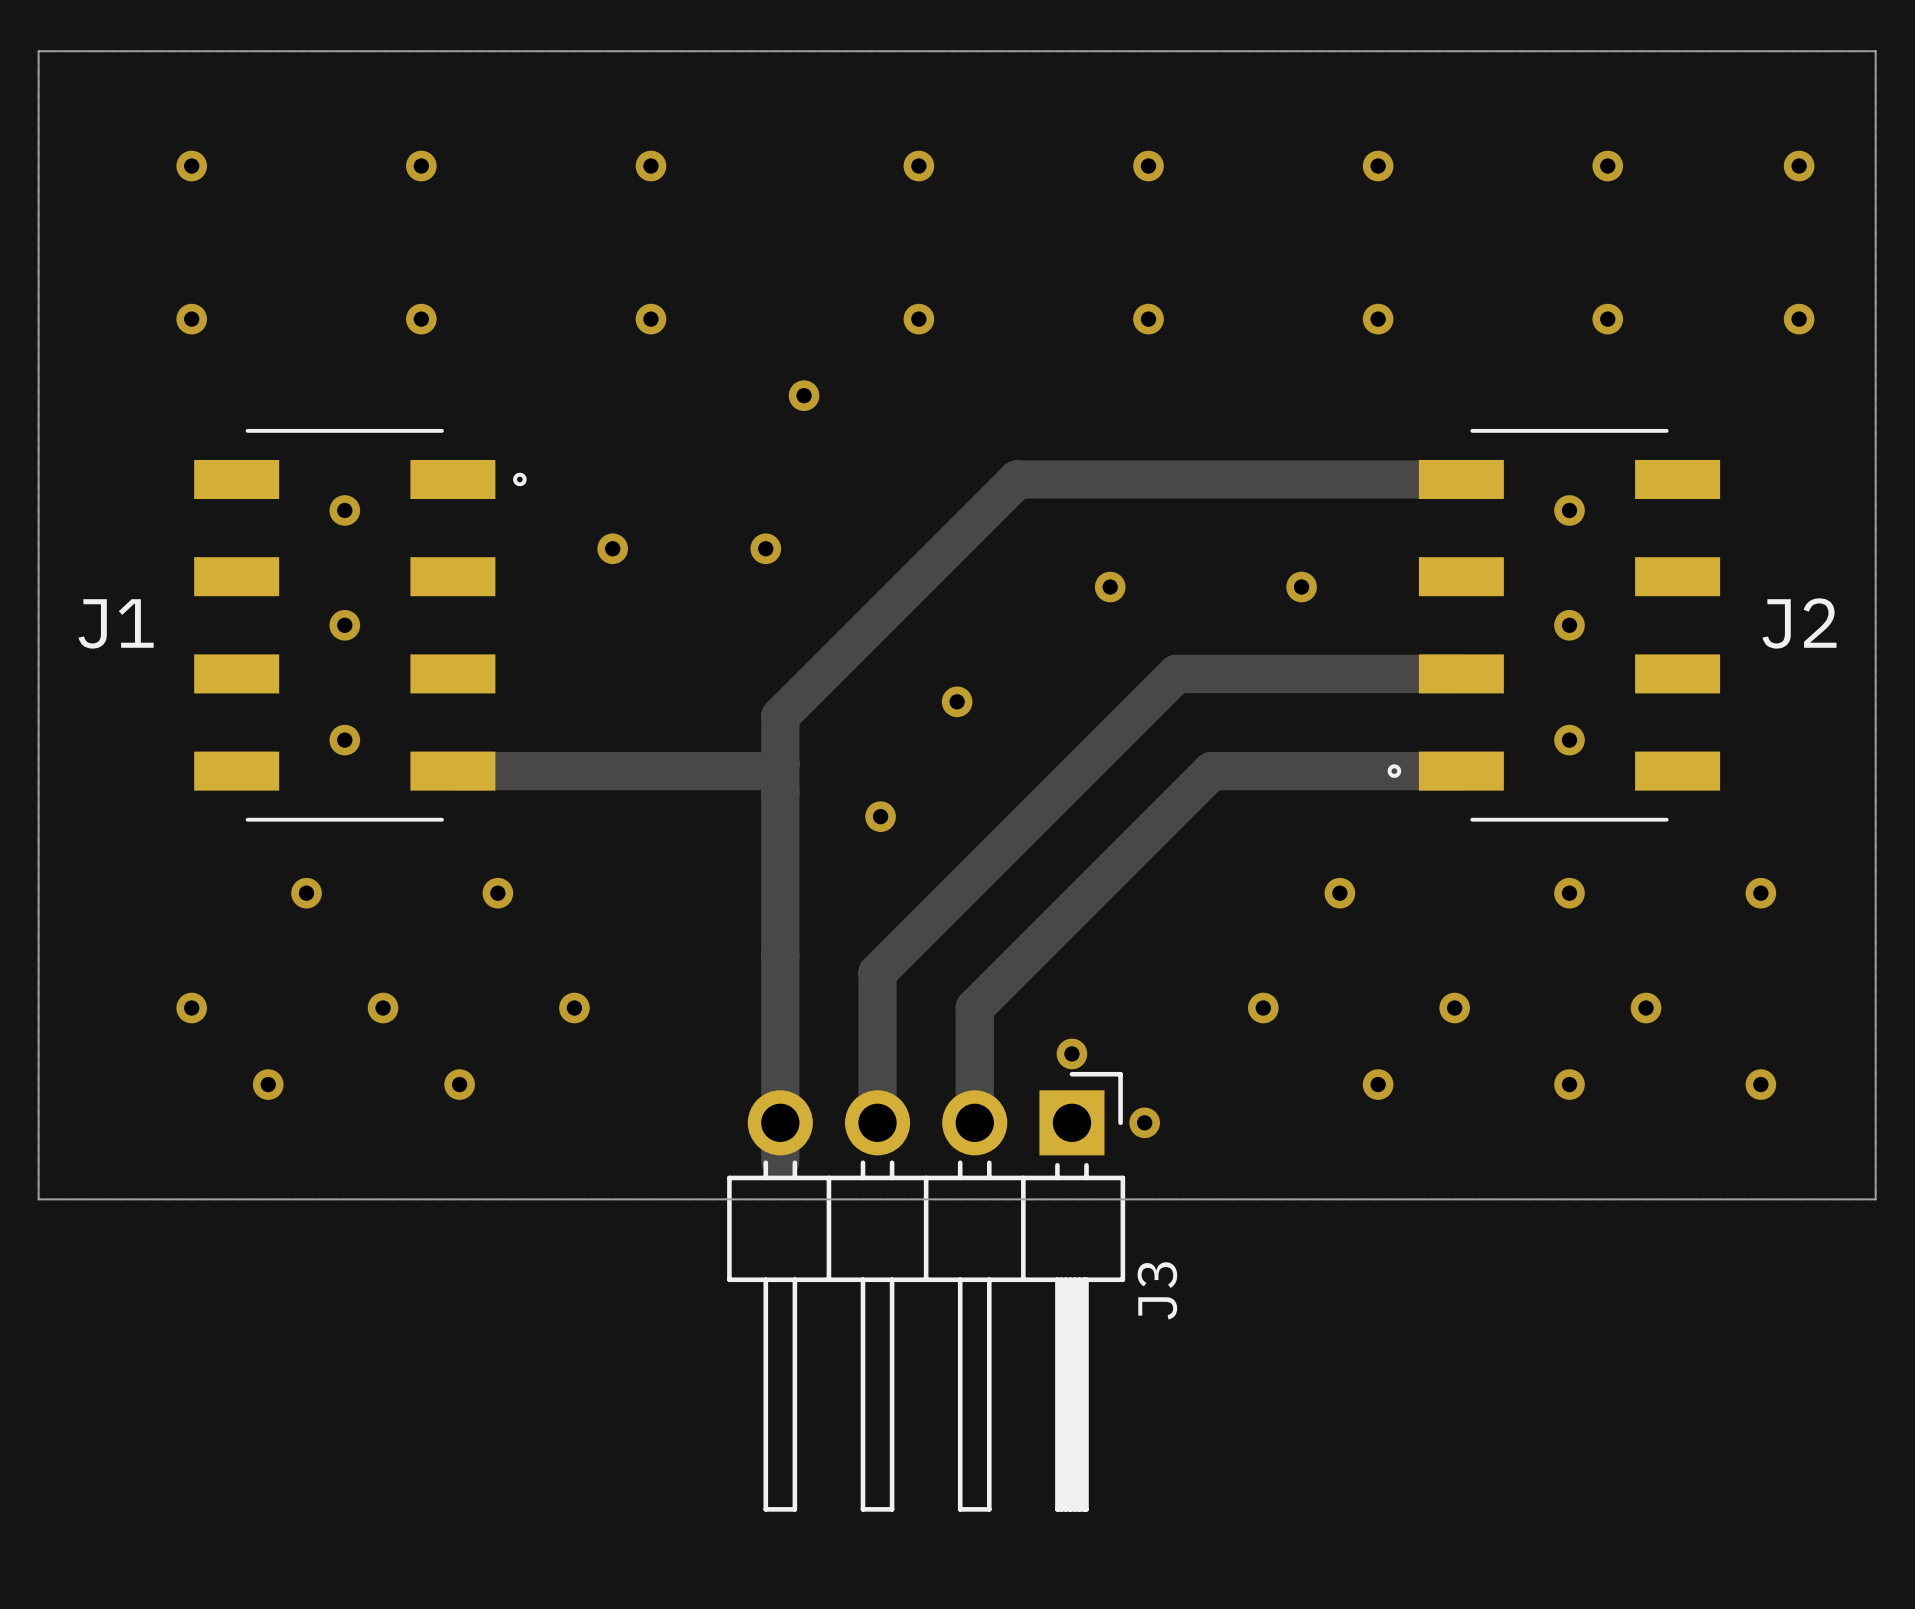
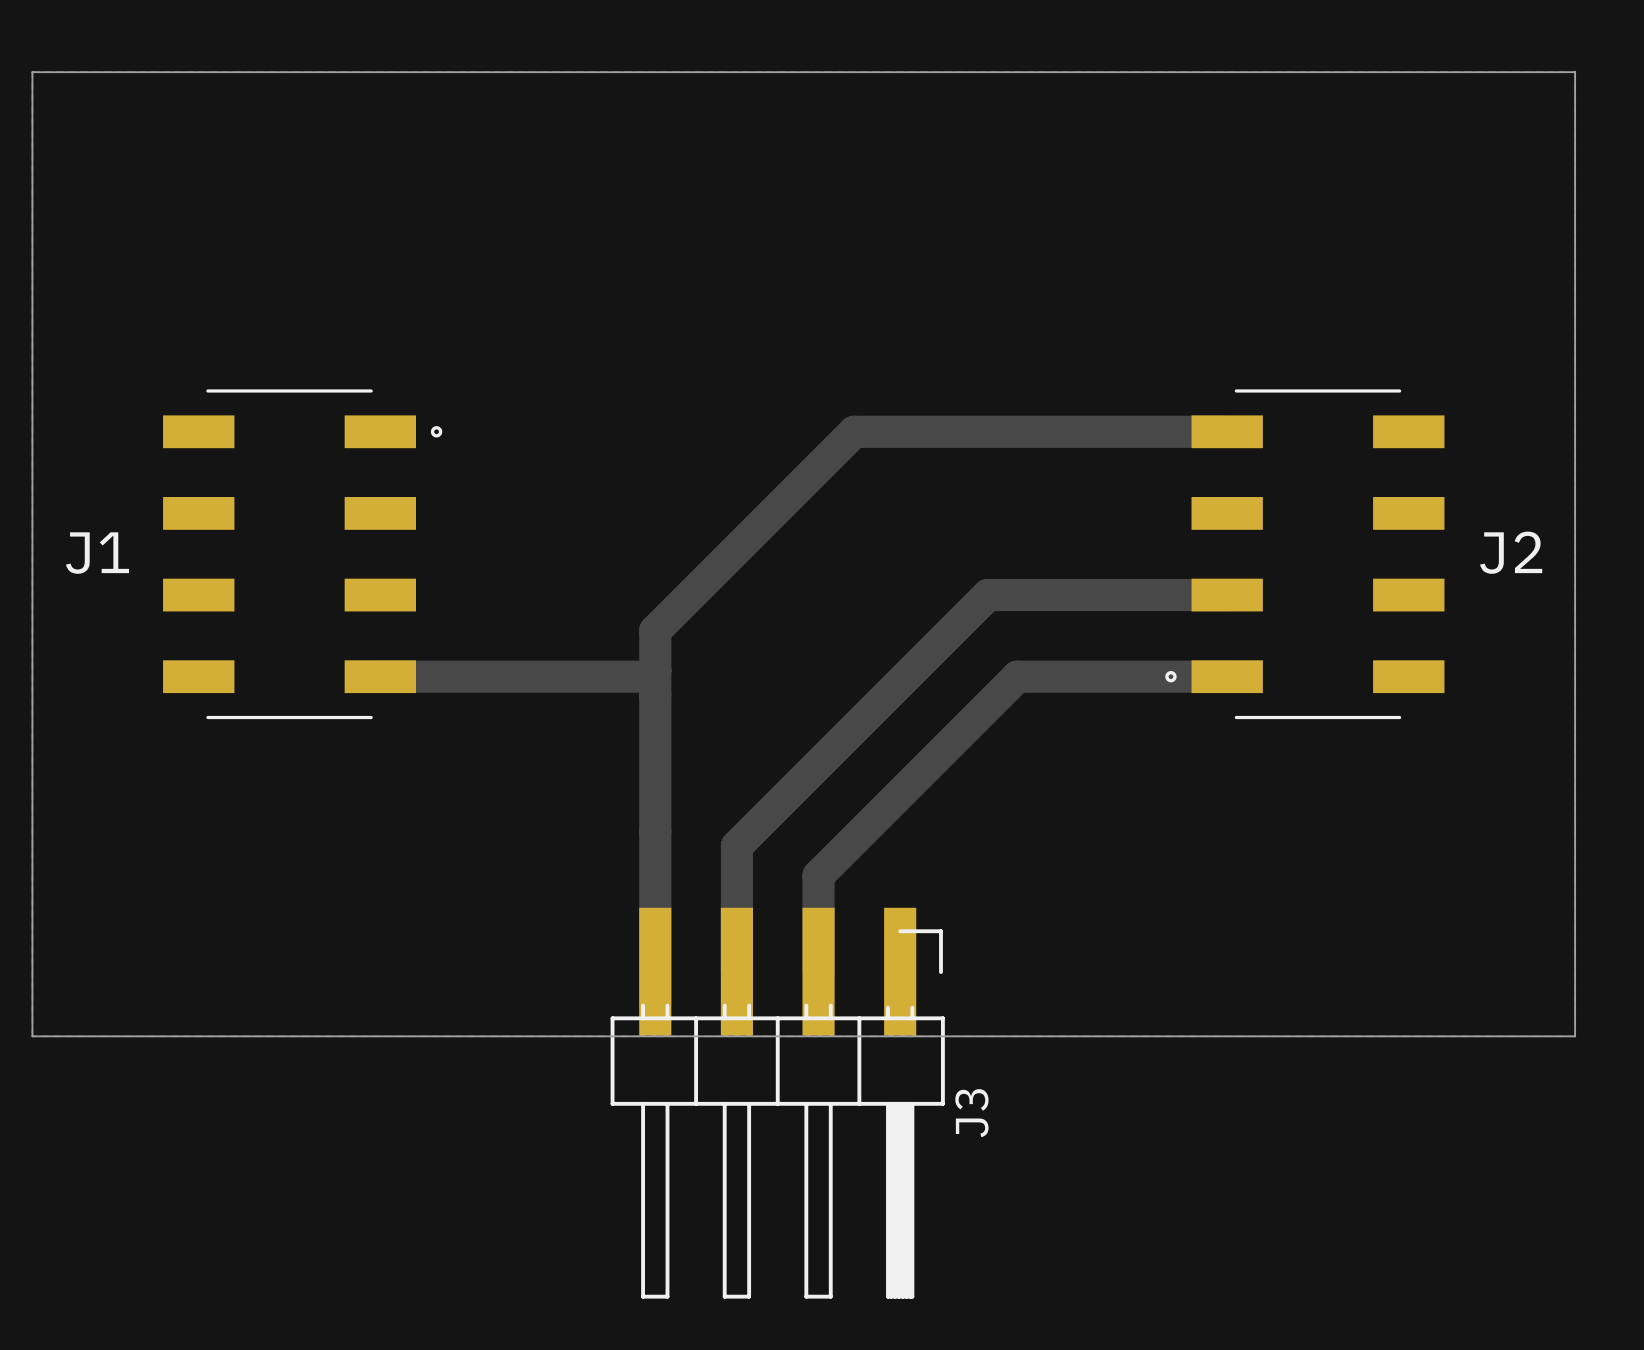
via: (191, 166) -> none
via: (421, 166) -> none
via: (650, 166) -> none
via: (918, 166) -> none
via: (1148, 166) -> none
via: (1378, 166) -> none
via: (1607, 166) -> none
via: (1799, 166) -> none
via: (191, 319) -> none
via: (421, 319) -> none
via: (650, 319) -> none
via: (918, 319) -> none
via: (1148, 319) -> none
via: (1378, 319) -> none
via: (1607, 319) -> none
via: (1799, 319) -> none
via: (804, 395) -> none
via: (344, 510) -> none
via: (1569, 510) -> none
via: (612, 548) -> none
via: (765, 548) -> none
via: (1110, 587) -> none
via: (1301, 587) -> none
via: (344, 625) -> none
via: (1569, 625) -> none
via: (957, 701) -> none
via: (344, 740) -> none
via: (1569, 740) -> none
via: (880, 816) -> none
via: (306, 893) -> none
via: (497, 893) -> none
via: (1339, 893) -> none
via: (1569, 893) -> none
via: (1760, 893) -> none
via: (191, 1008) -> none
via: (383, 1008) -> none
via: (574, 1008) -> none
via: (1263, 1008) -> none
via: (1454, 1008) -> none
via: (1646, 1008) -> none
via: (1071, 1053) -> none
J3 footprint: [727, 1071, 1126, 1512] -> [610, 907, 945, 1299]
via: (268, 1084) -> none
via: (459, 1084) -> none
via: (1378, 1084) -> none
via: (1569, 1084) -> none
via: (1760, 1084) -> none
via: (1144, 1122) -> none

